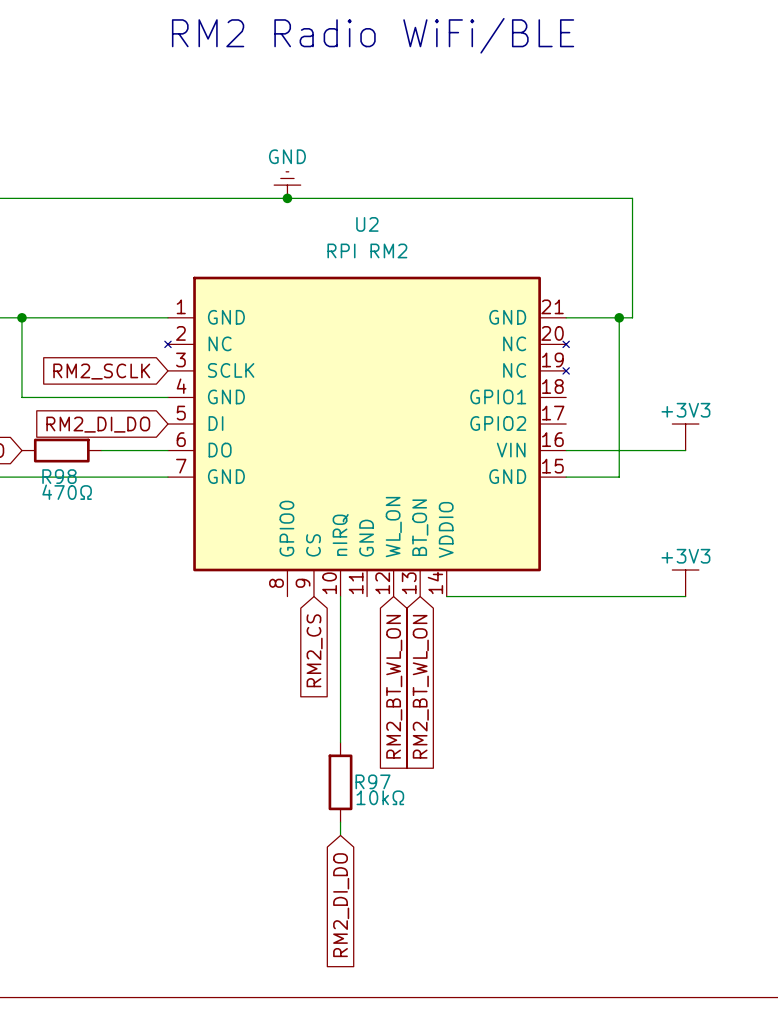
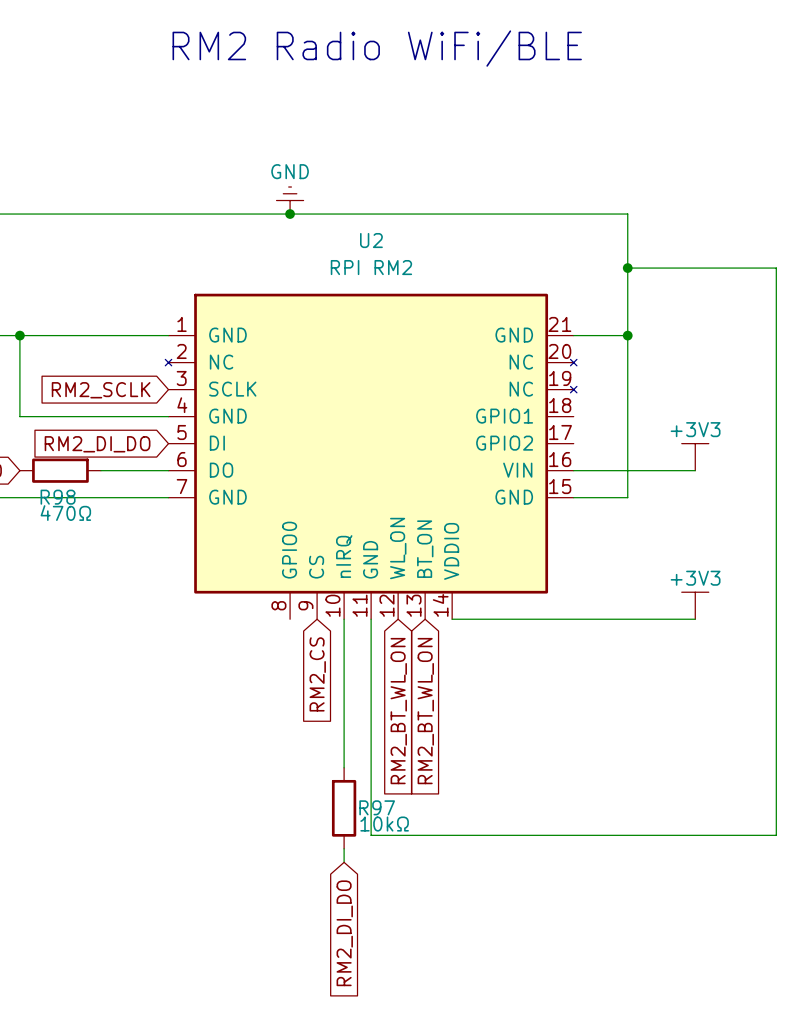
wire: (619, 198) (632, 198) (632, 317) (619, 317) -> (627, 214) (627, 335)
wire: none -> (627, 268) (776, 268) (776, 835) (371, 835) (371, 619)
junction: none -> (627, 268)

